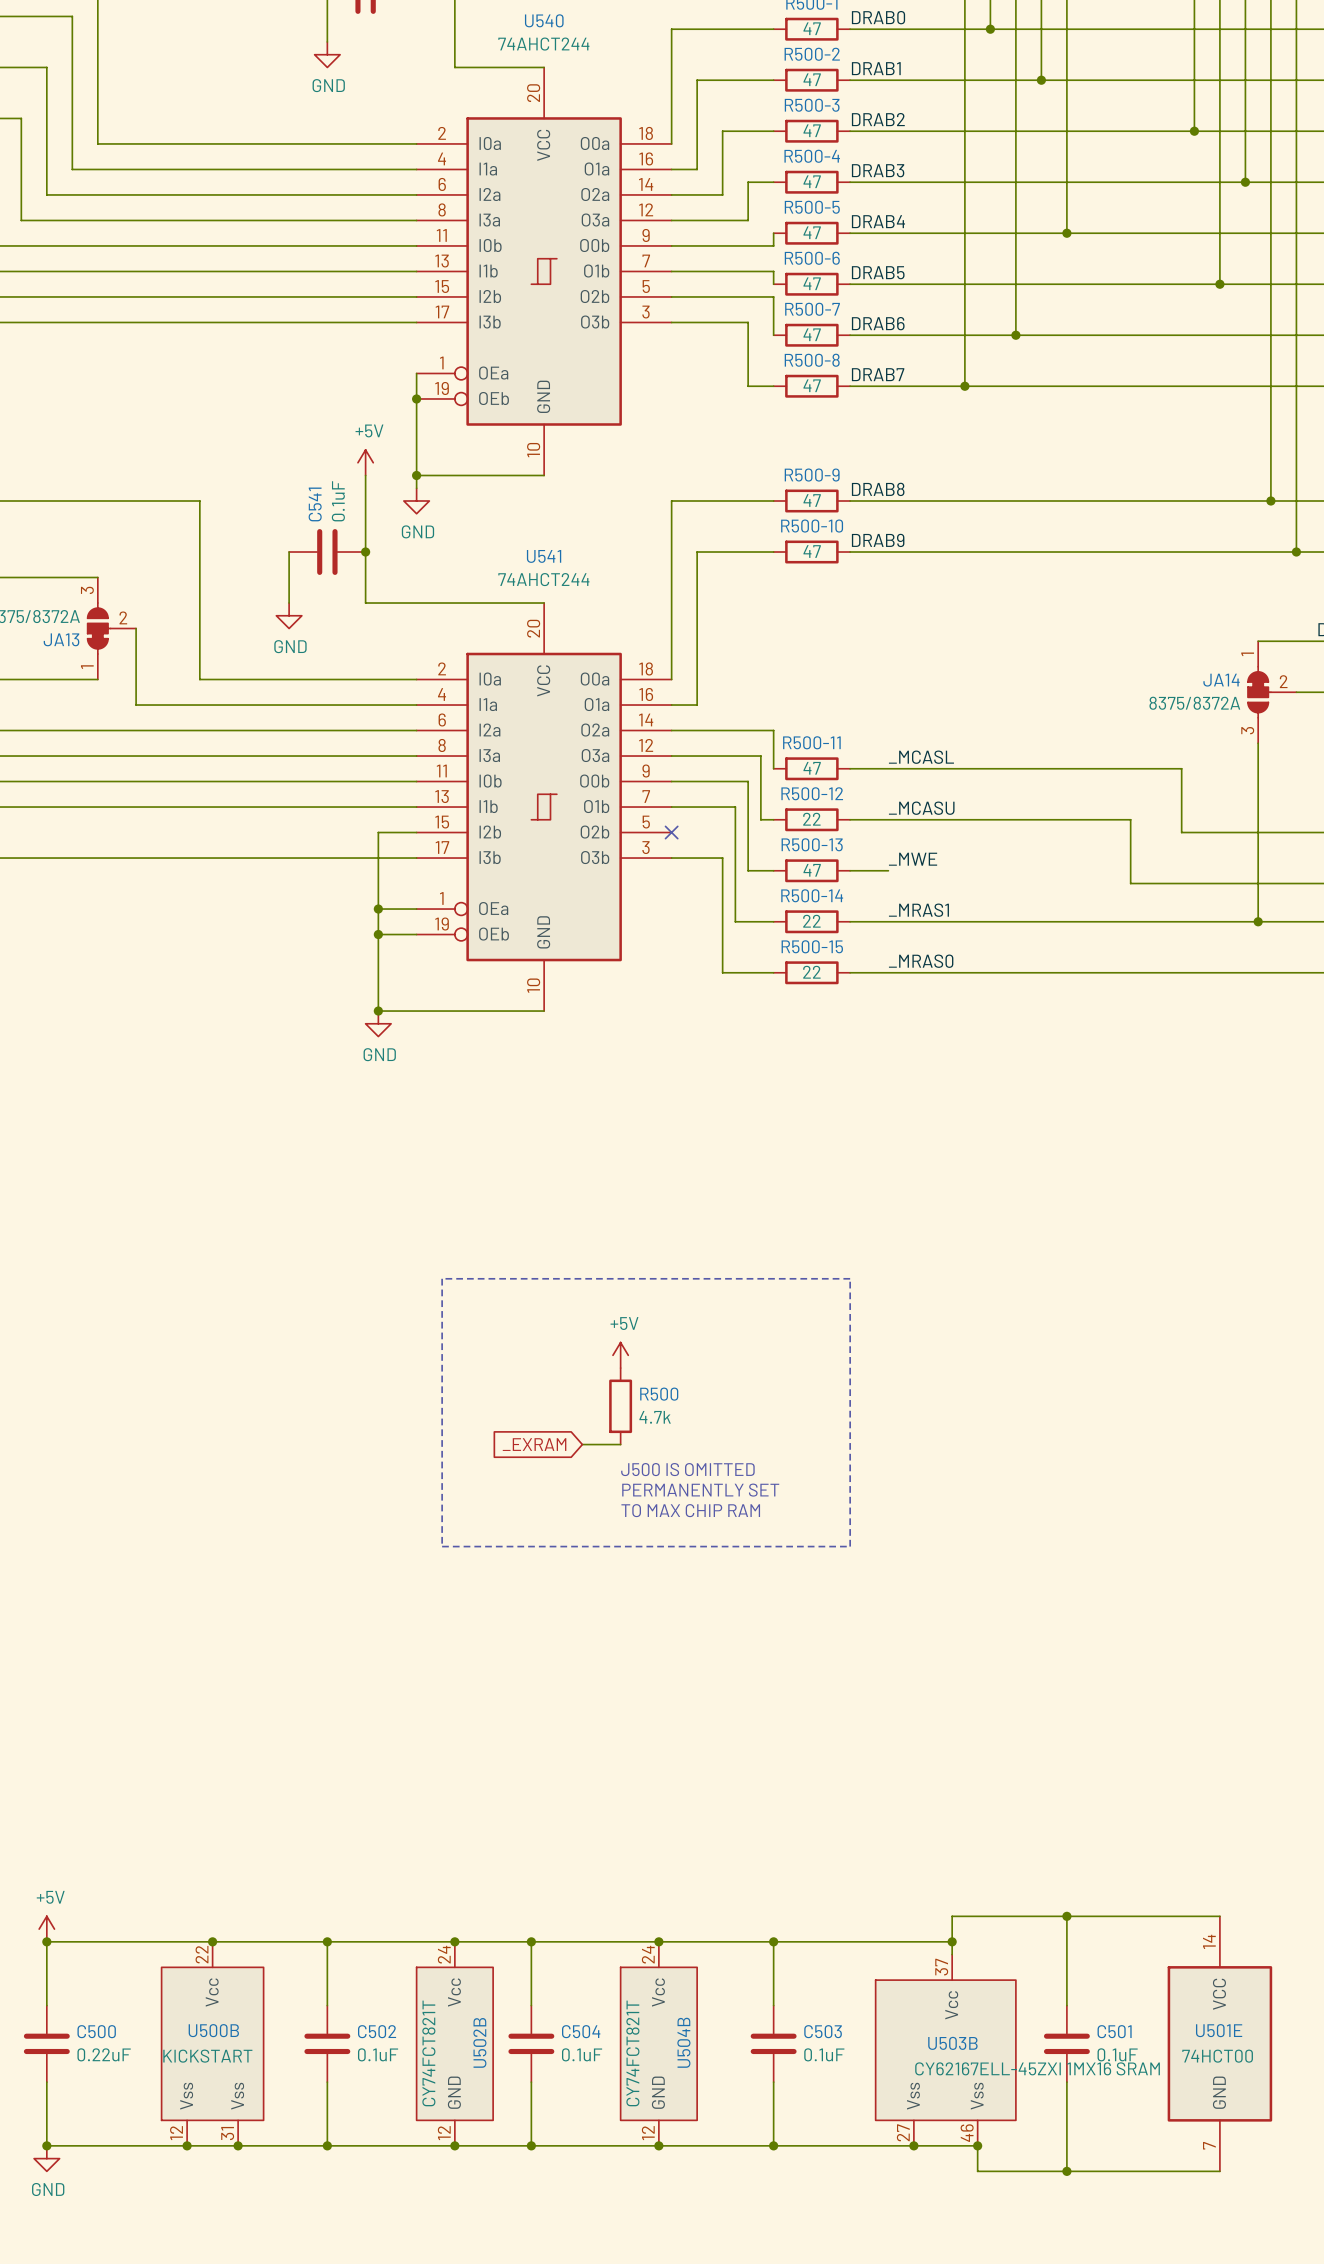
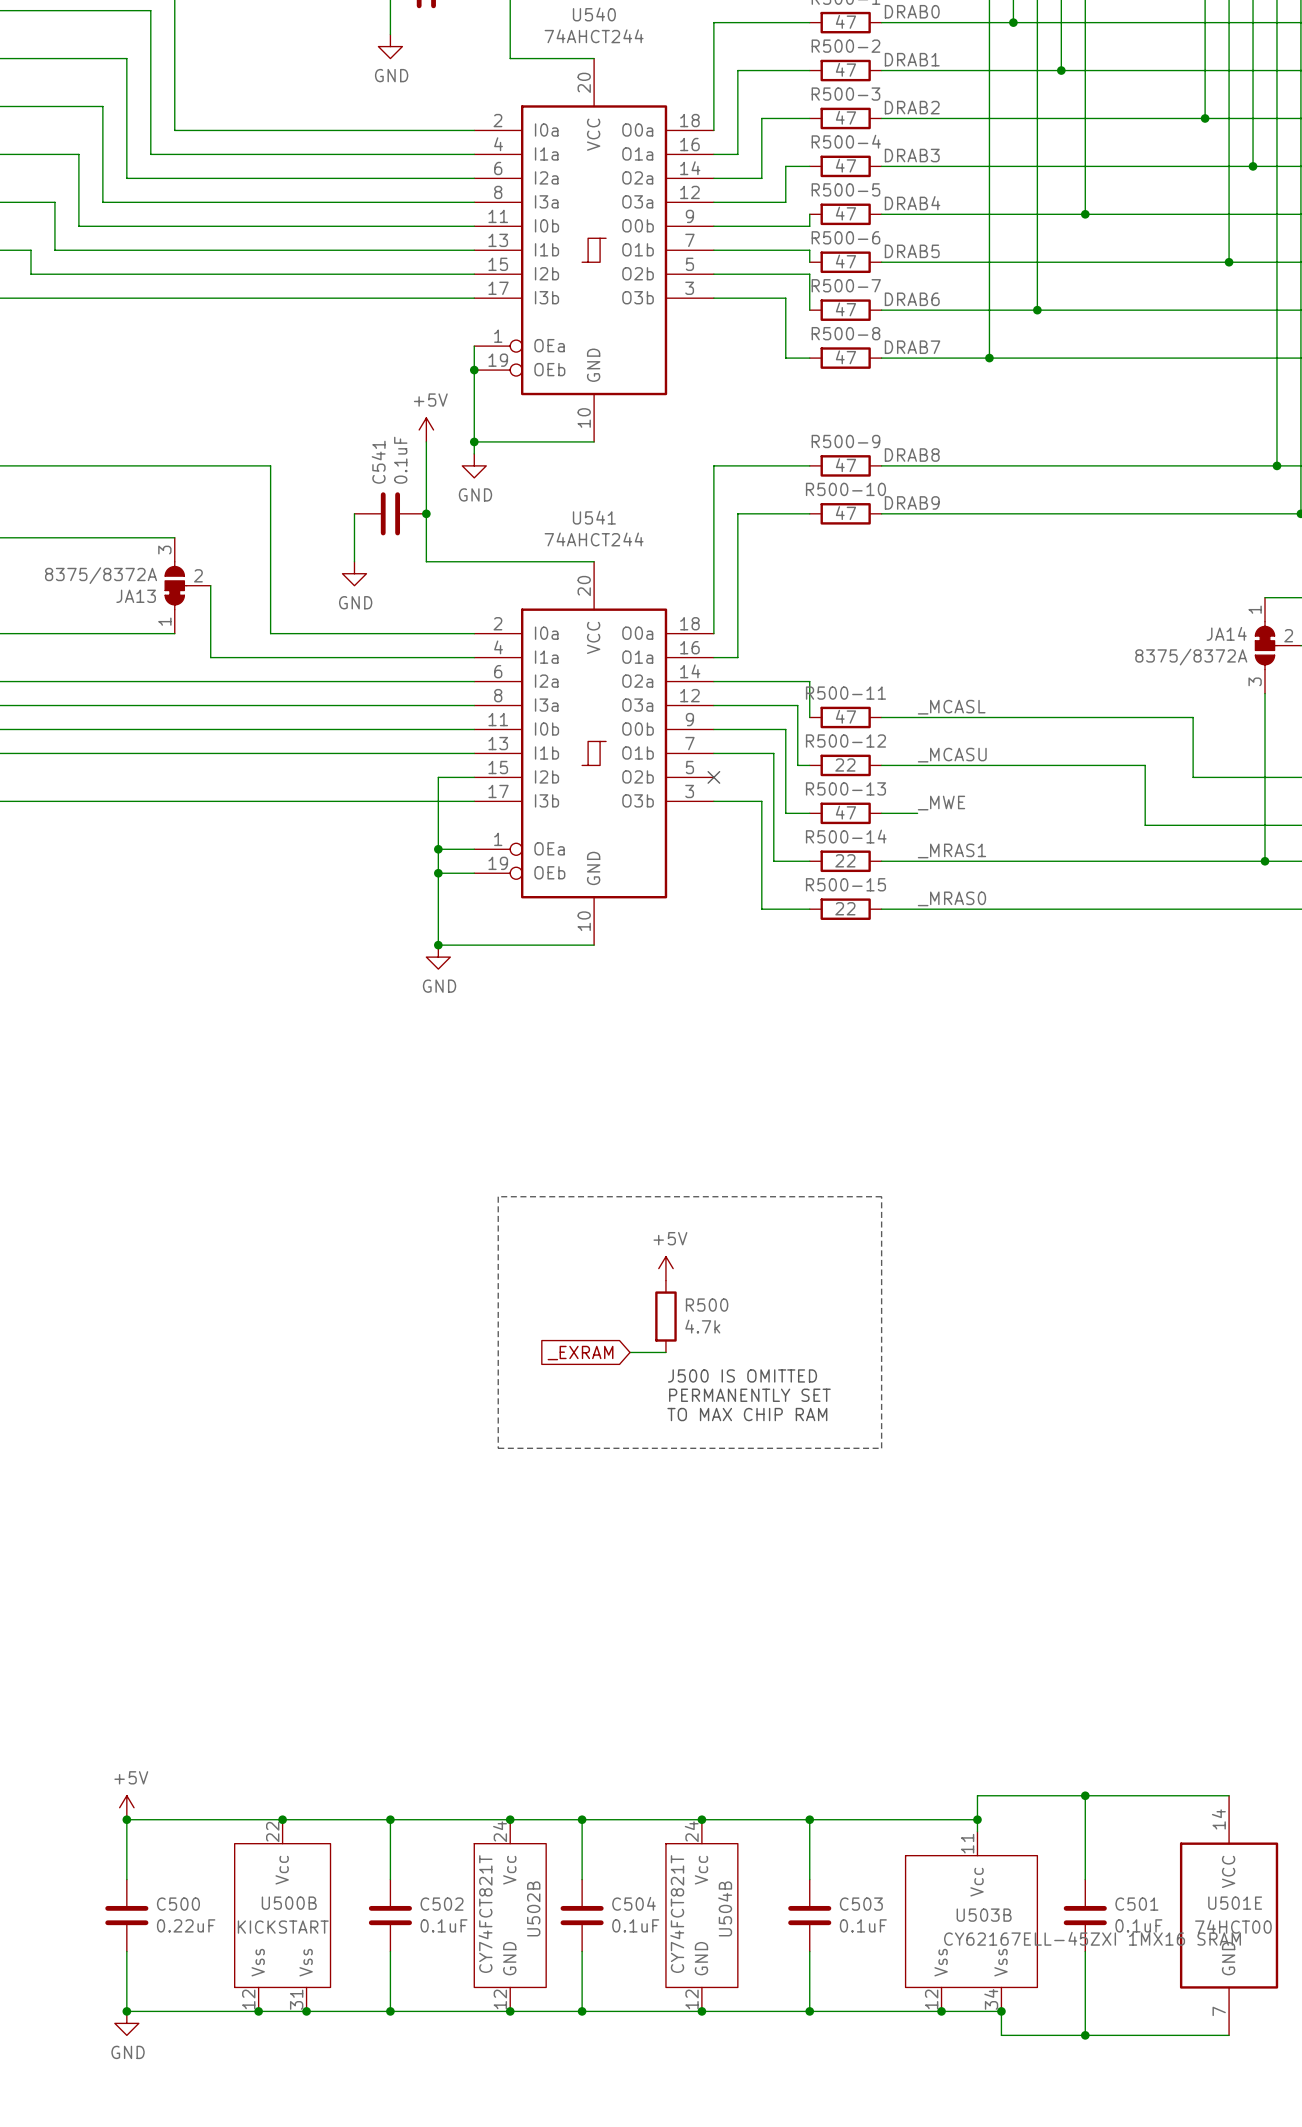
U503B pin number: 37 (941, 1967) -> 11 (967, 1843)
U503B pin number: 27 (903, 2132) -> 12 (931, 1999)
U503B pin number: 46 (967, 2133) -> 34 (991, 1999)

